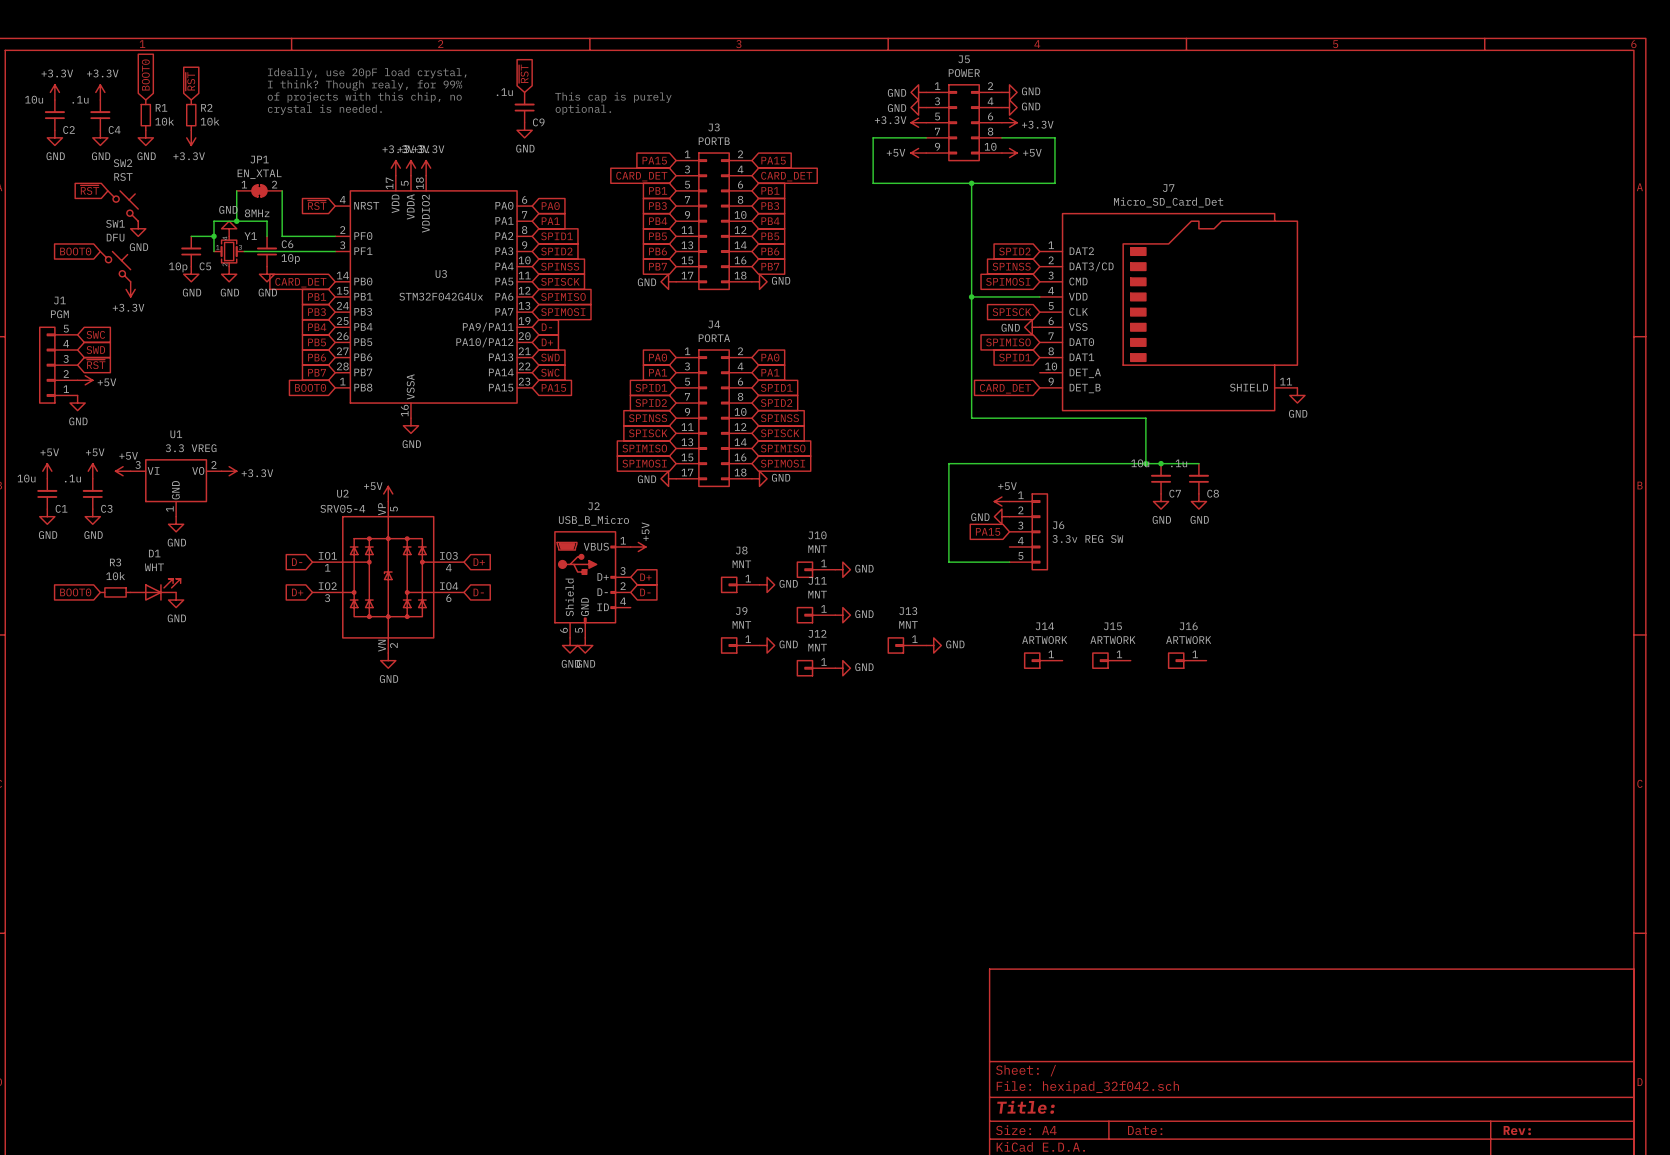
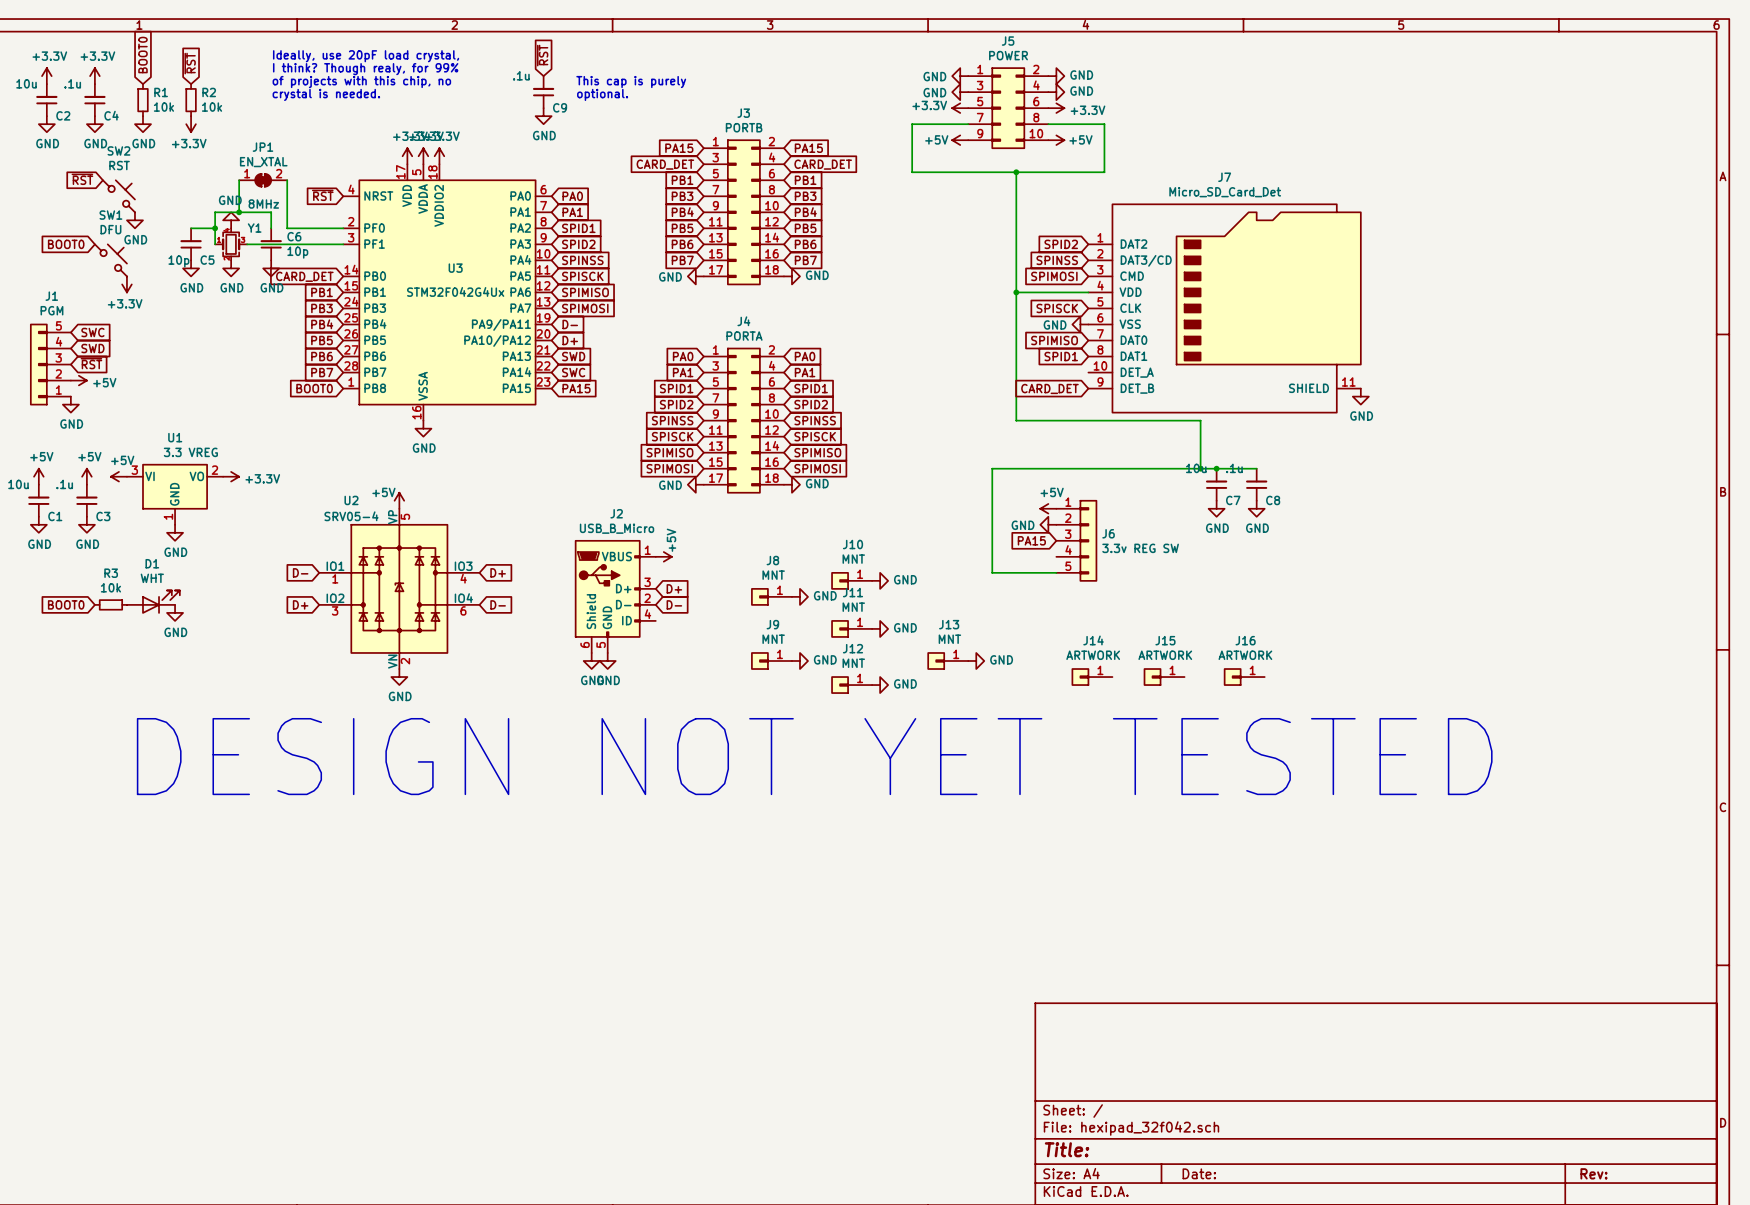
text: none -> DESIGN NOT YET TESTED (814, 756)

